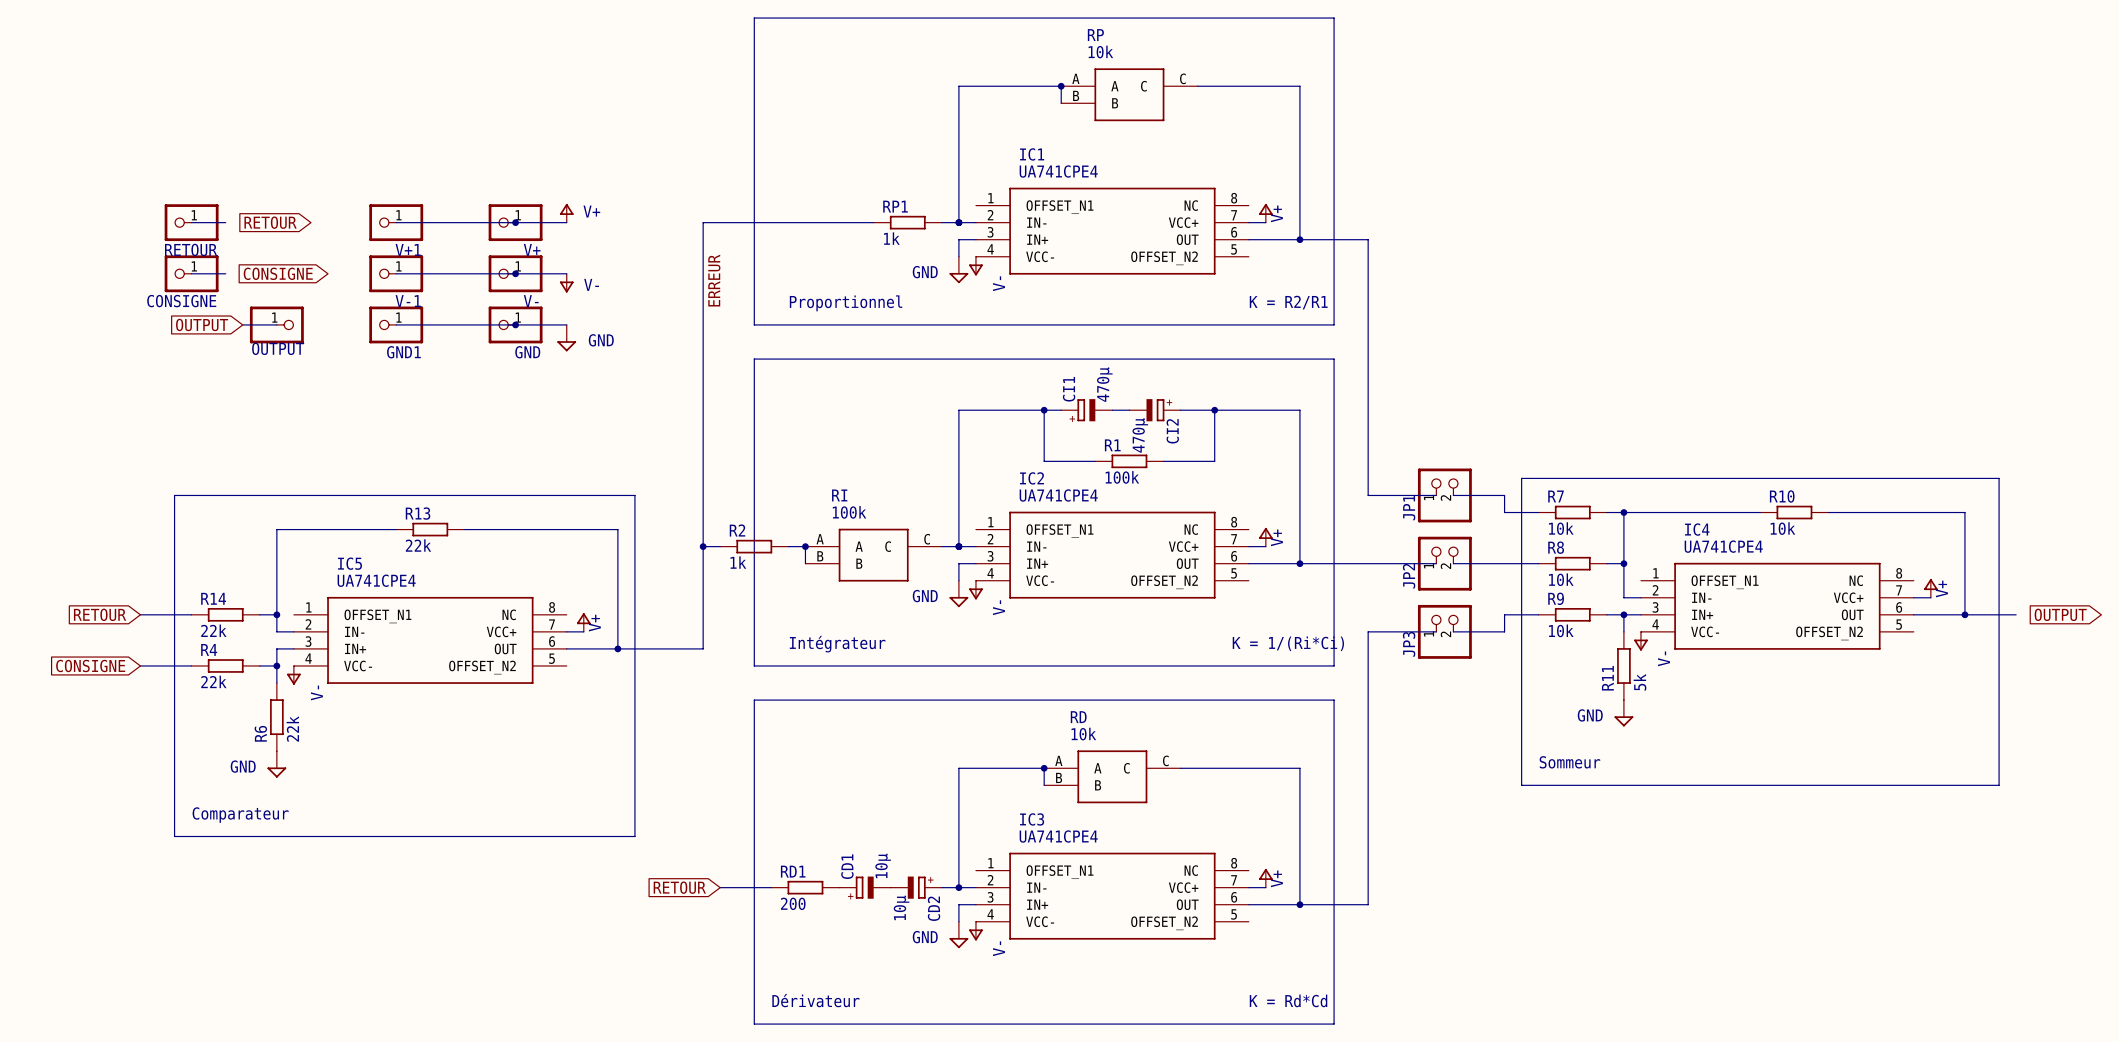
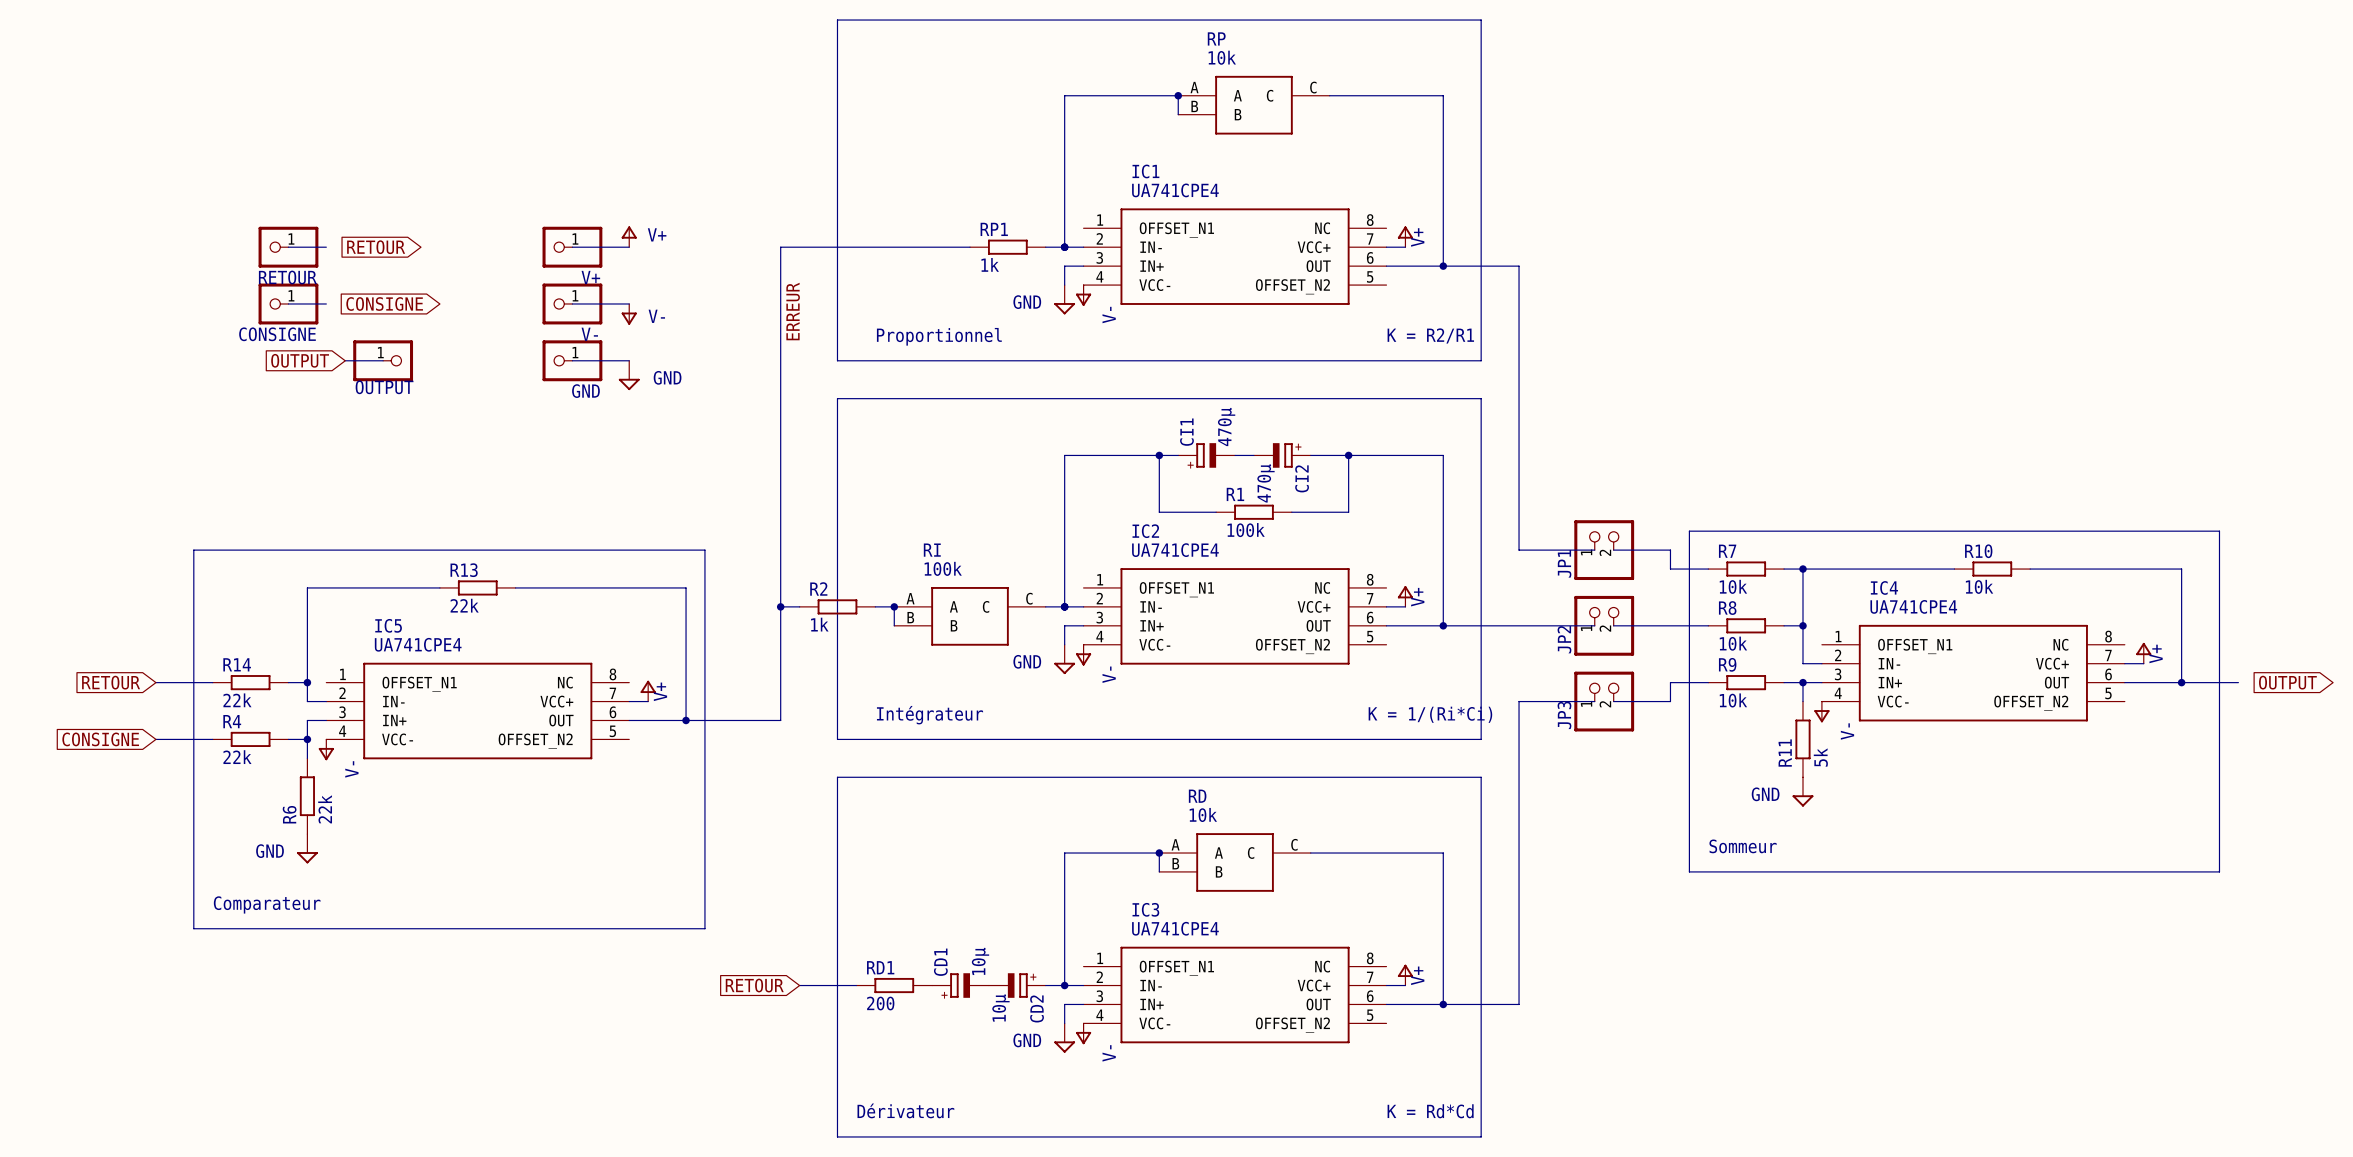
wire: (191, 222) (225, 222) -> (288, 247) (326, 247)
RETOUR position: (191, 222) -> (288, 247)
global label position: RETOUR (270, 222) -> RETOUR (376, 247)
wire: (396, 222) (515, 222) -> none
V+1: (396, 222) -> none
junction: (515, 222) -> none
wire: (191, 273) (225, 273) -> (288, 303) (326, 303)
CONSIGNE position: (191, 273) -> (288, 303)
global label position: CONSIGNE (278, 273) -> CONSIGNE (384, 304)
wire: (396, 273) (515, 273) -> none
V-1: (396, 273) -> none
junction: (515, 273) -> none
global label position: OUTPUT (202, 324) -> OUTPUT (300, 360)
wire: (242, 324) (276, 324) -> (345, 360) (383, 360)
OUTPUT position: (276, 324) -> (383, 360)
wire: (396, 324) (515, 324) -> none
GND1: (396, 324) -> none
junction: (515, 324) -> none

